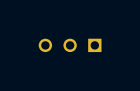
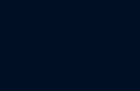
part: (70, 45) -> none

